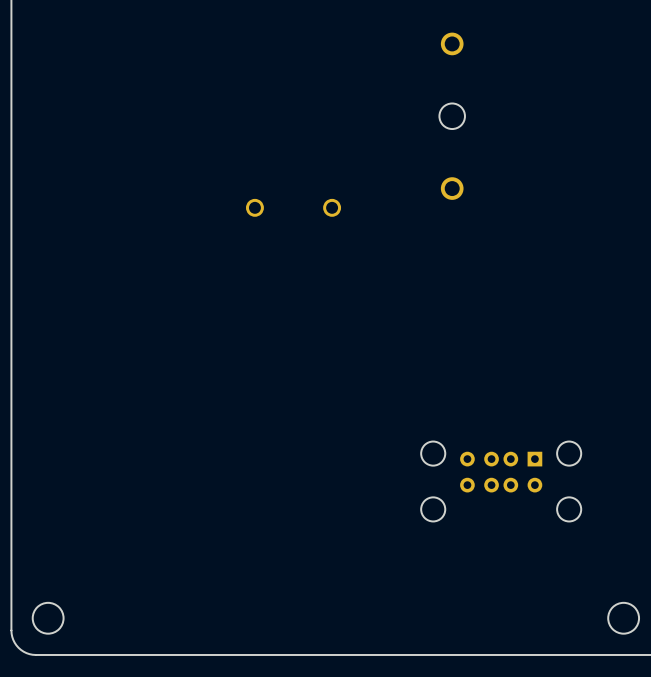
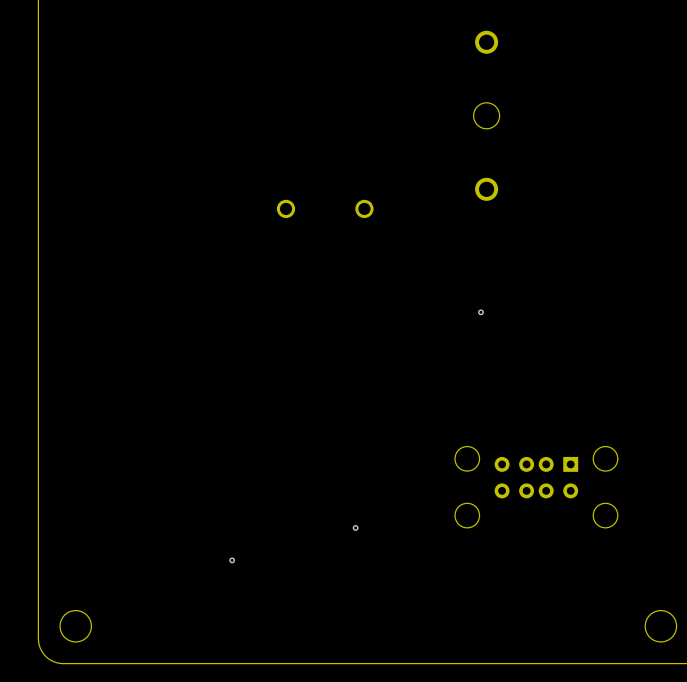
via: none -> (481, 312)
via: none -> (355, 527)
via: none -> (232, 560)

